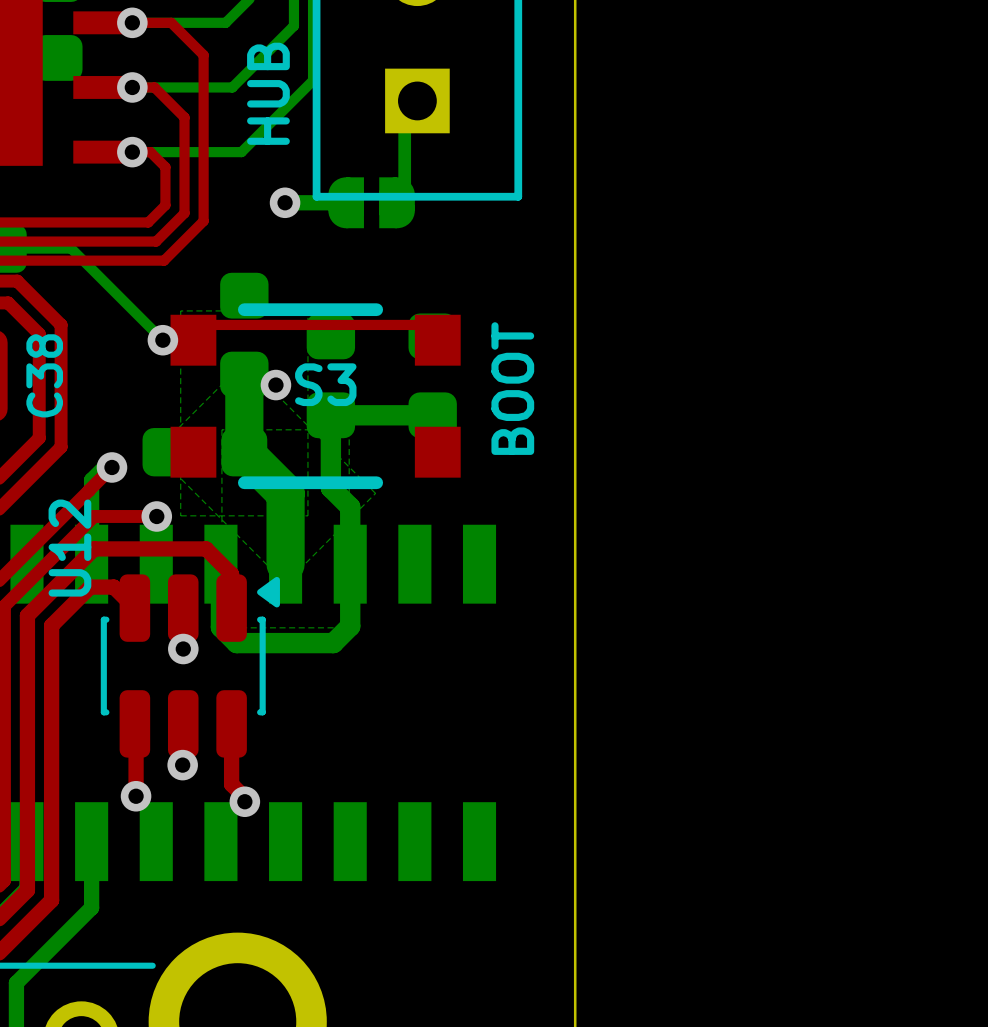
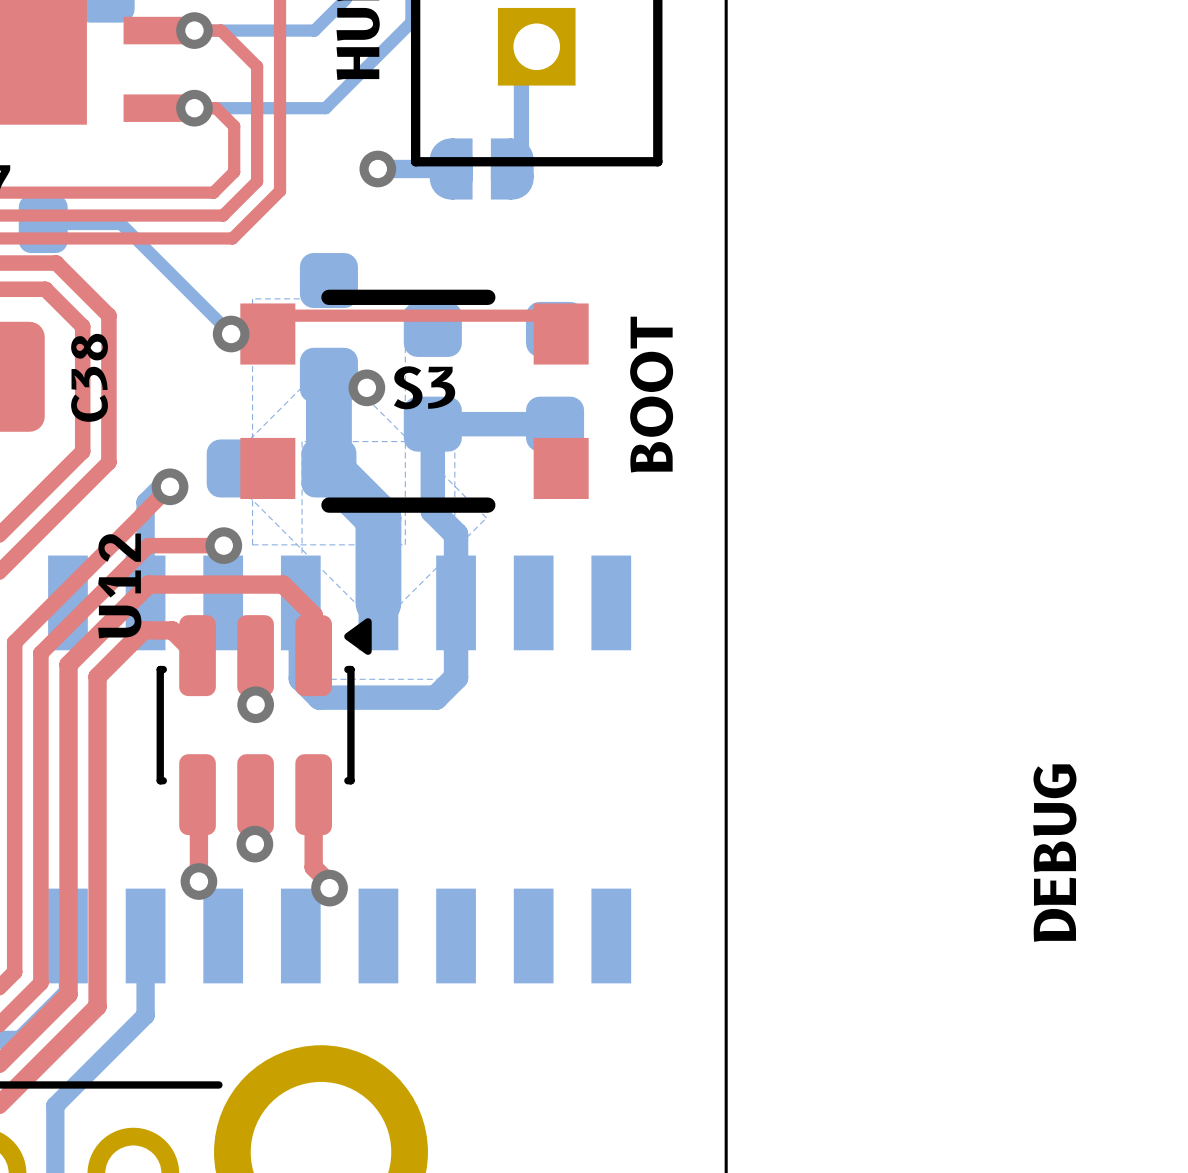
text: none -> DEBUG (1054, 853)

